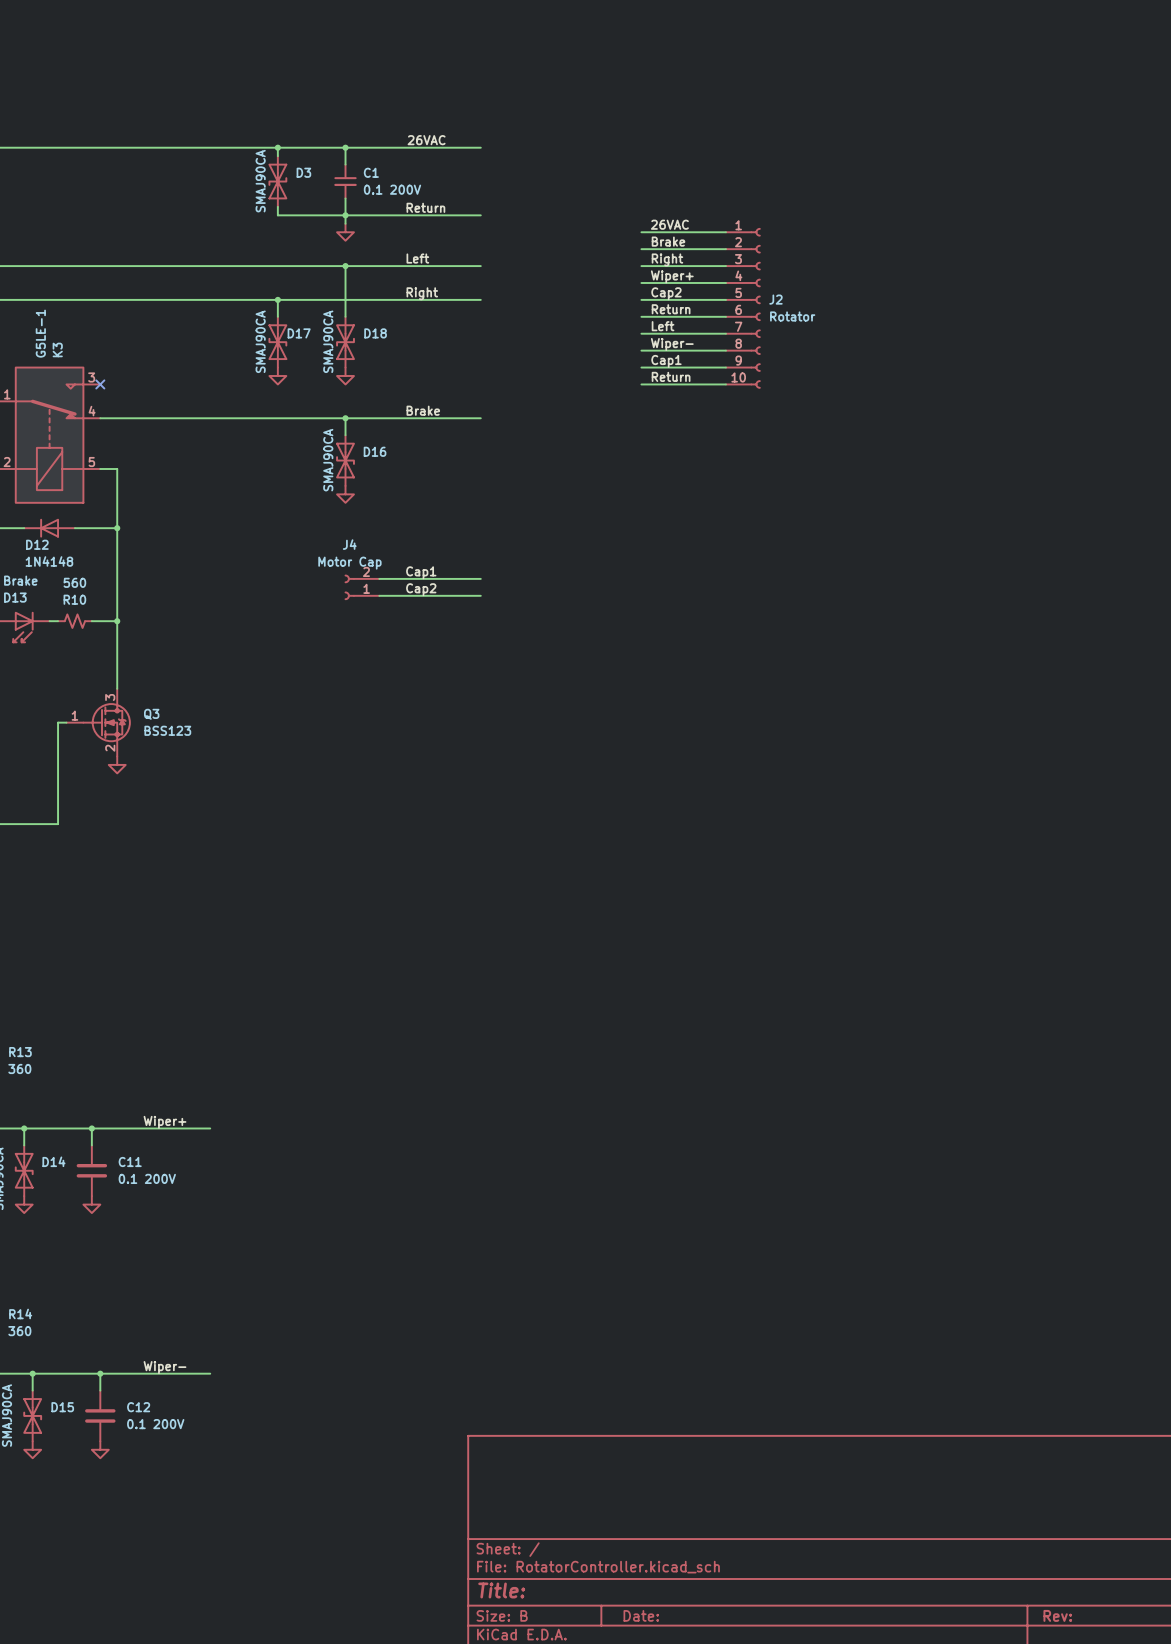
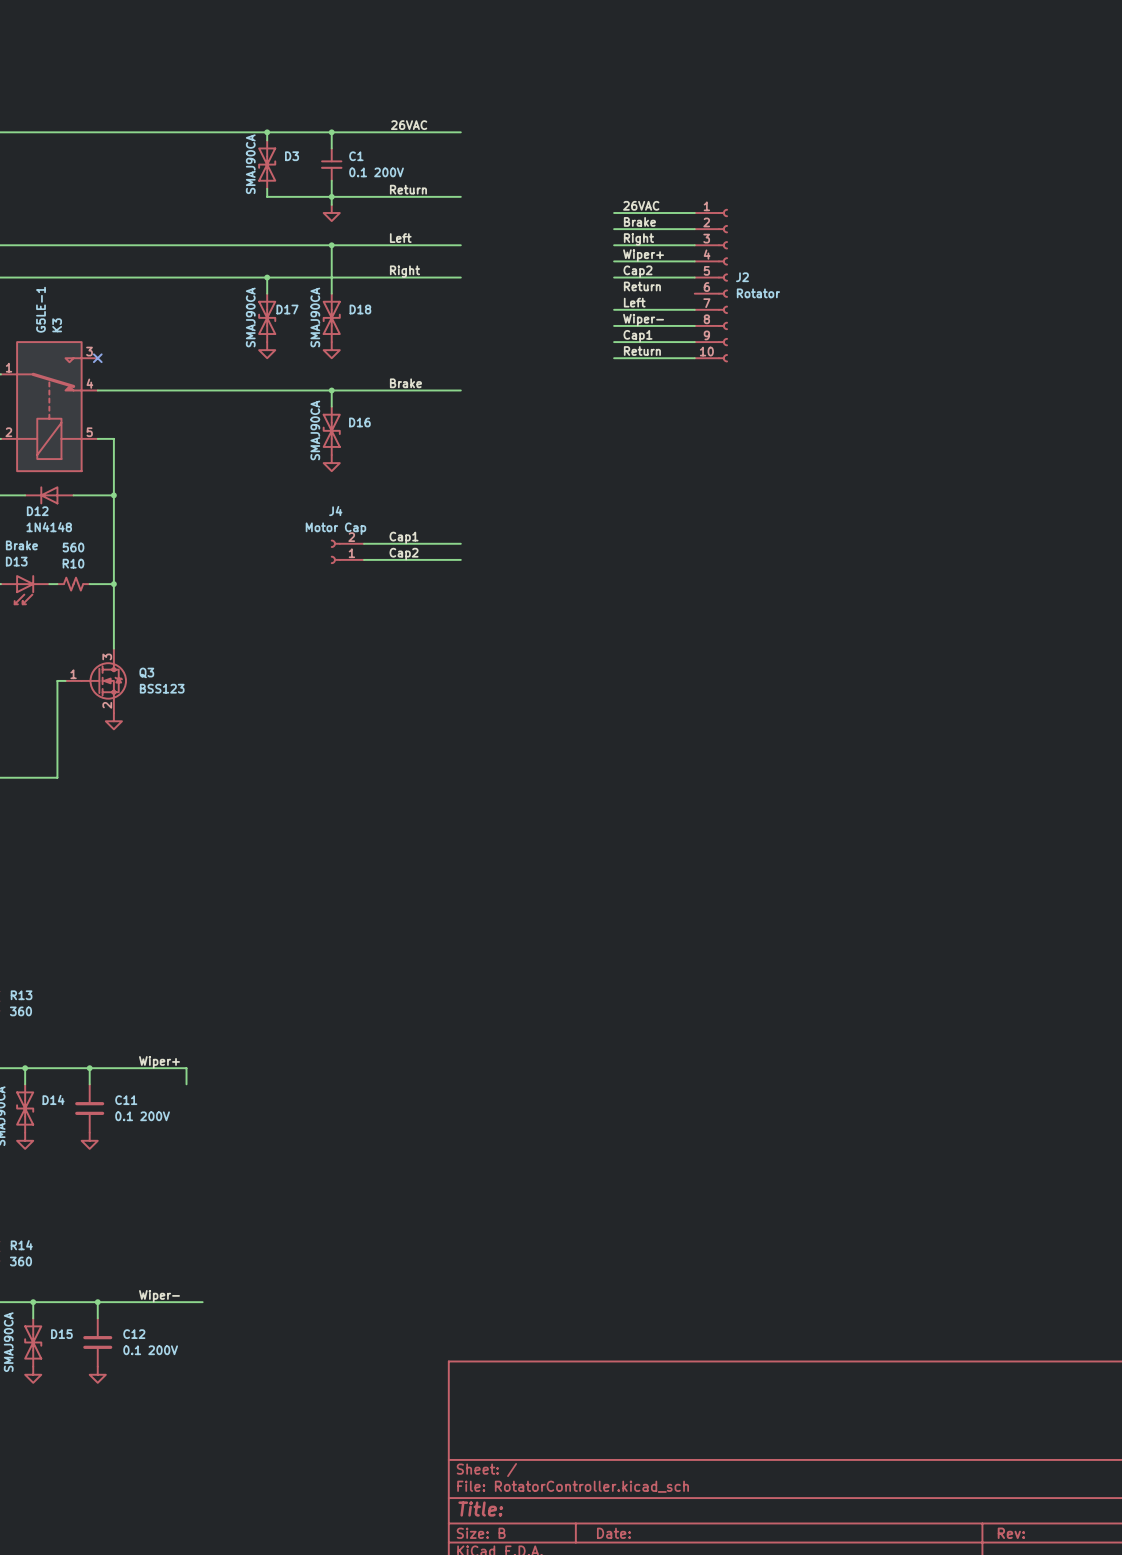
wire: (641, 316) (725, 316) -> none
wire: (193, 1128) (210, 1128) -> (186, 1068) (186, 1084)

